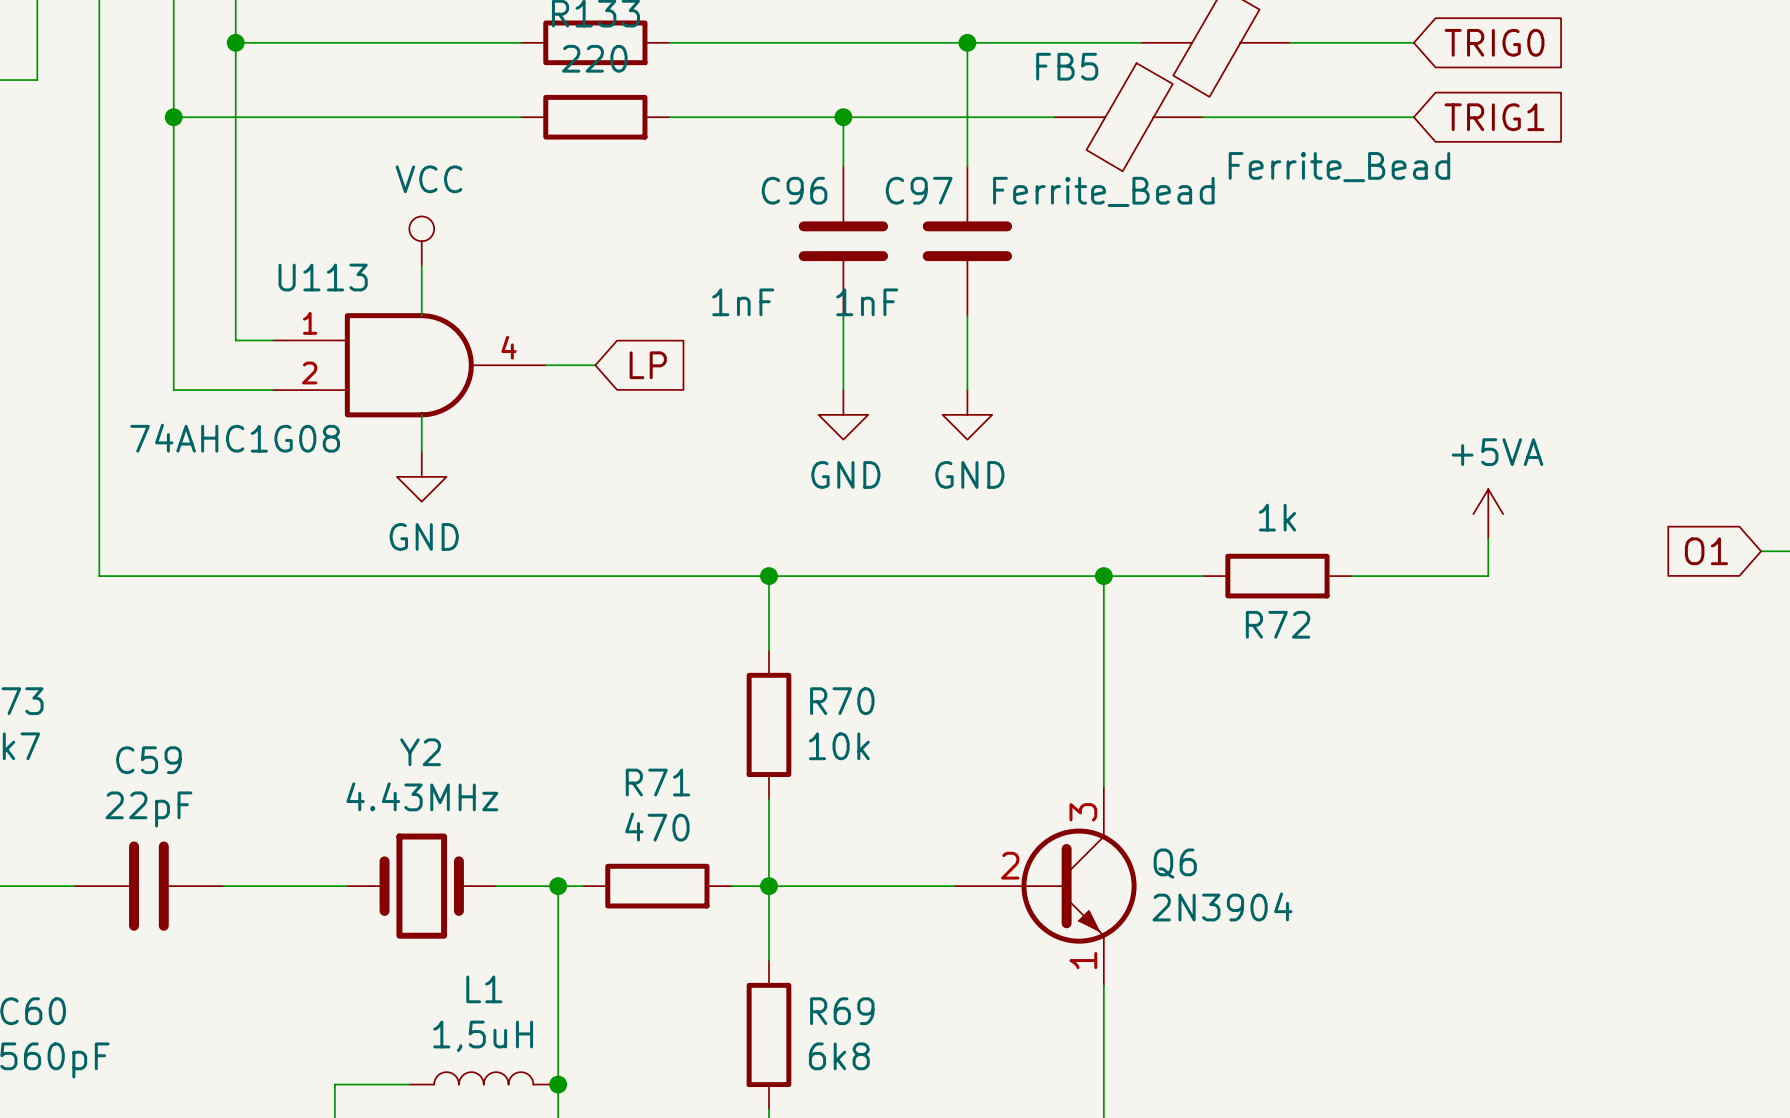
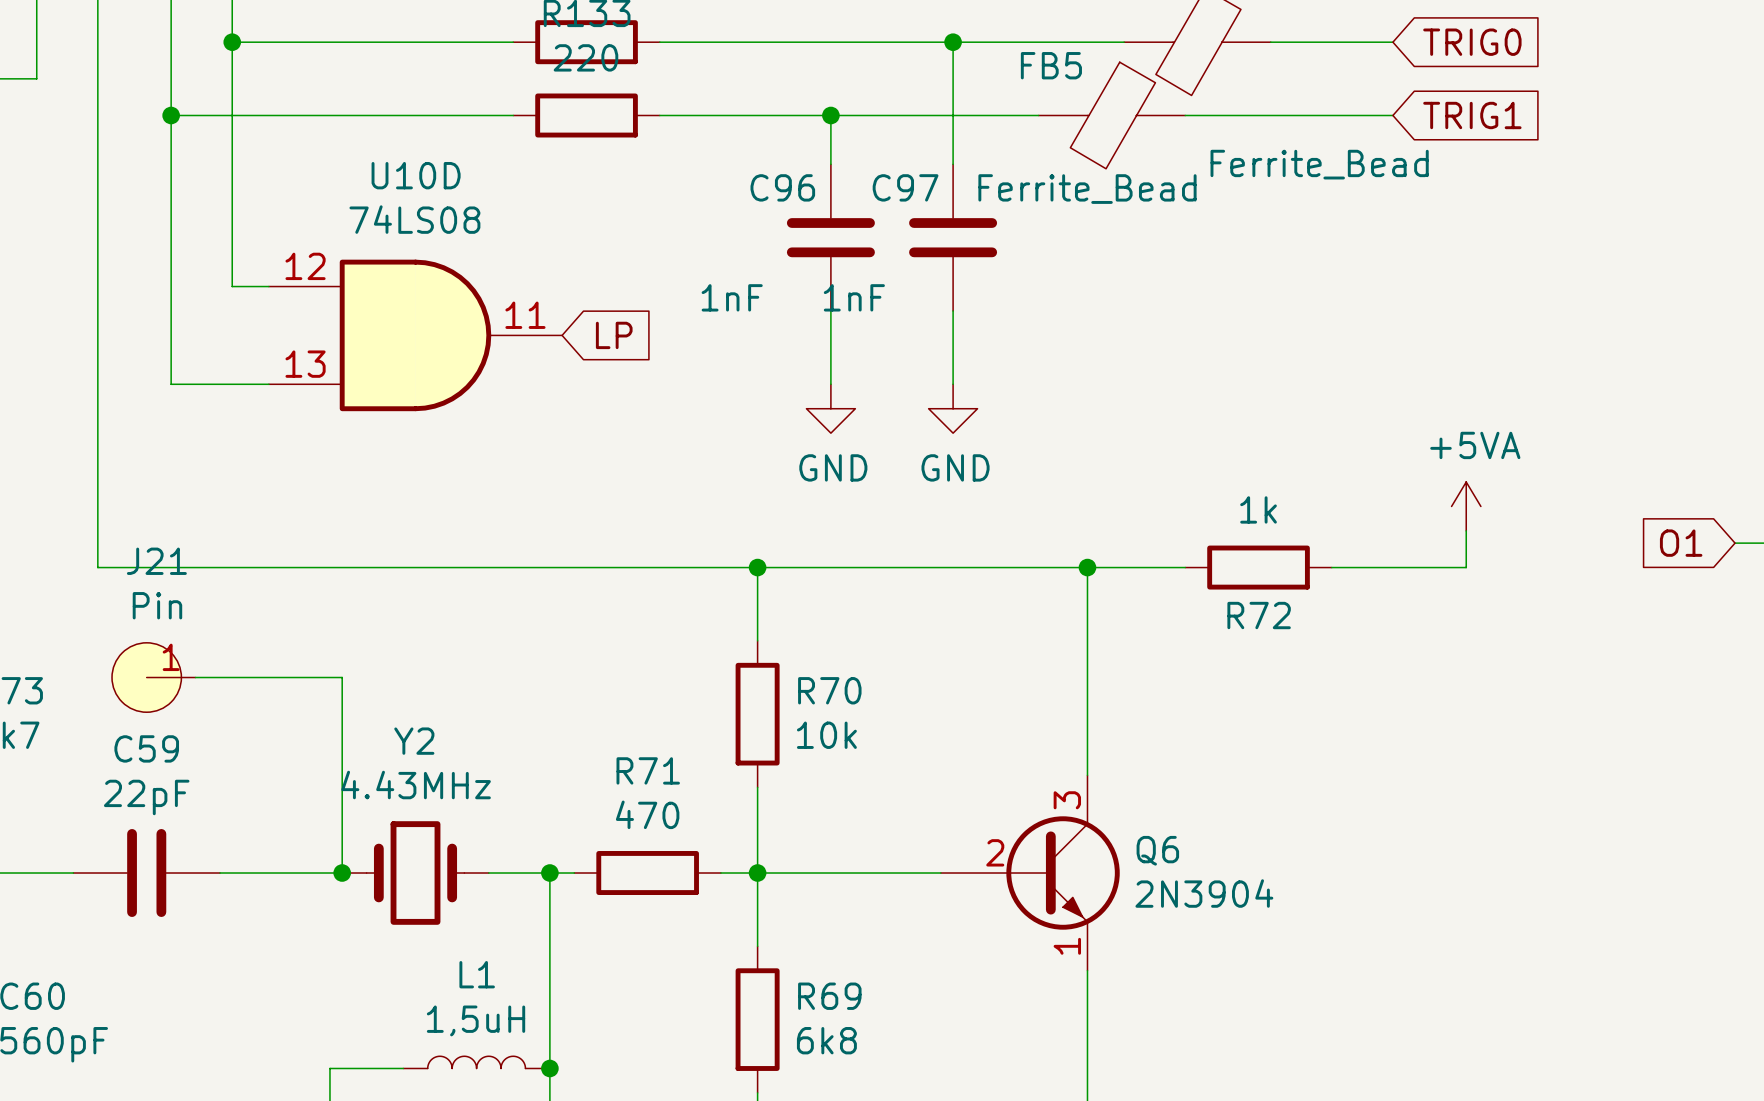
power symbol: VCC (421, 241) -> none
wire: (235, 290) (235, 340) (272, 340) -> (232, 286) (268, 286)
U10D: none -> 74LS08 (415, 335)
U113: 74AHC1G08 (409, 365) -> none
wire: (545, 365) (595, 365) -> none
global label position: LP (648, 365) -> LP (614, 335)
wire: (421, 414) (421, 452) -> none
power symbol: GND (421, 476) -> none
J21: none -> Pin (153, 677)
wire: none -> (195, 677) (342, 677) (342, 873)
junction: none -> (342, 873)

